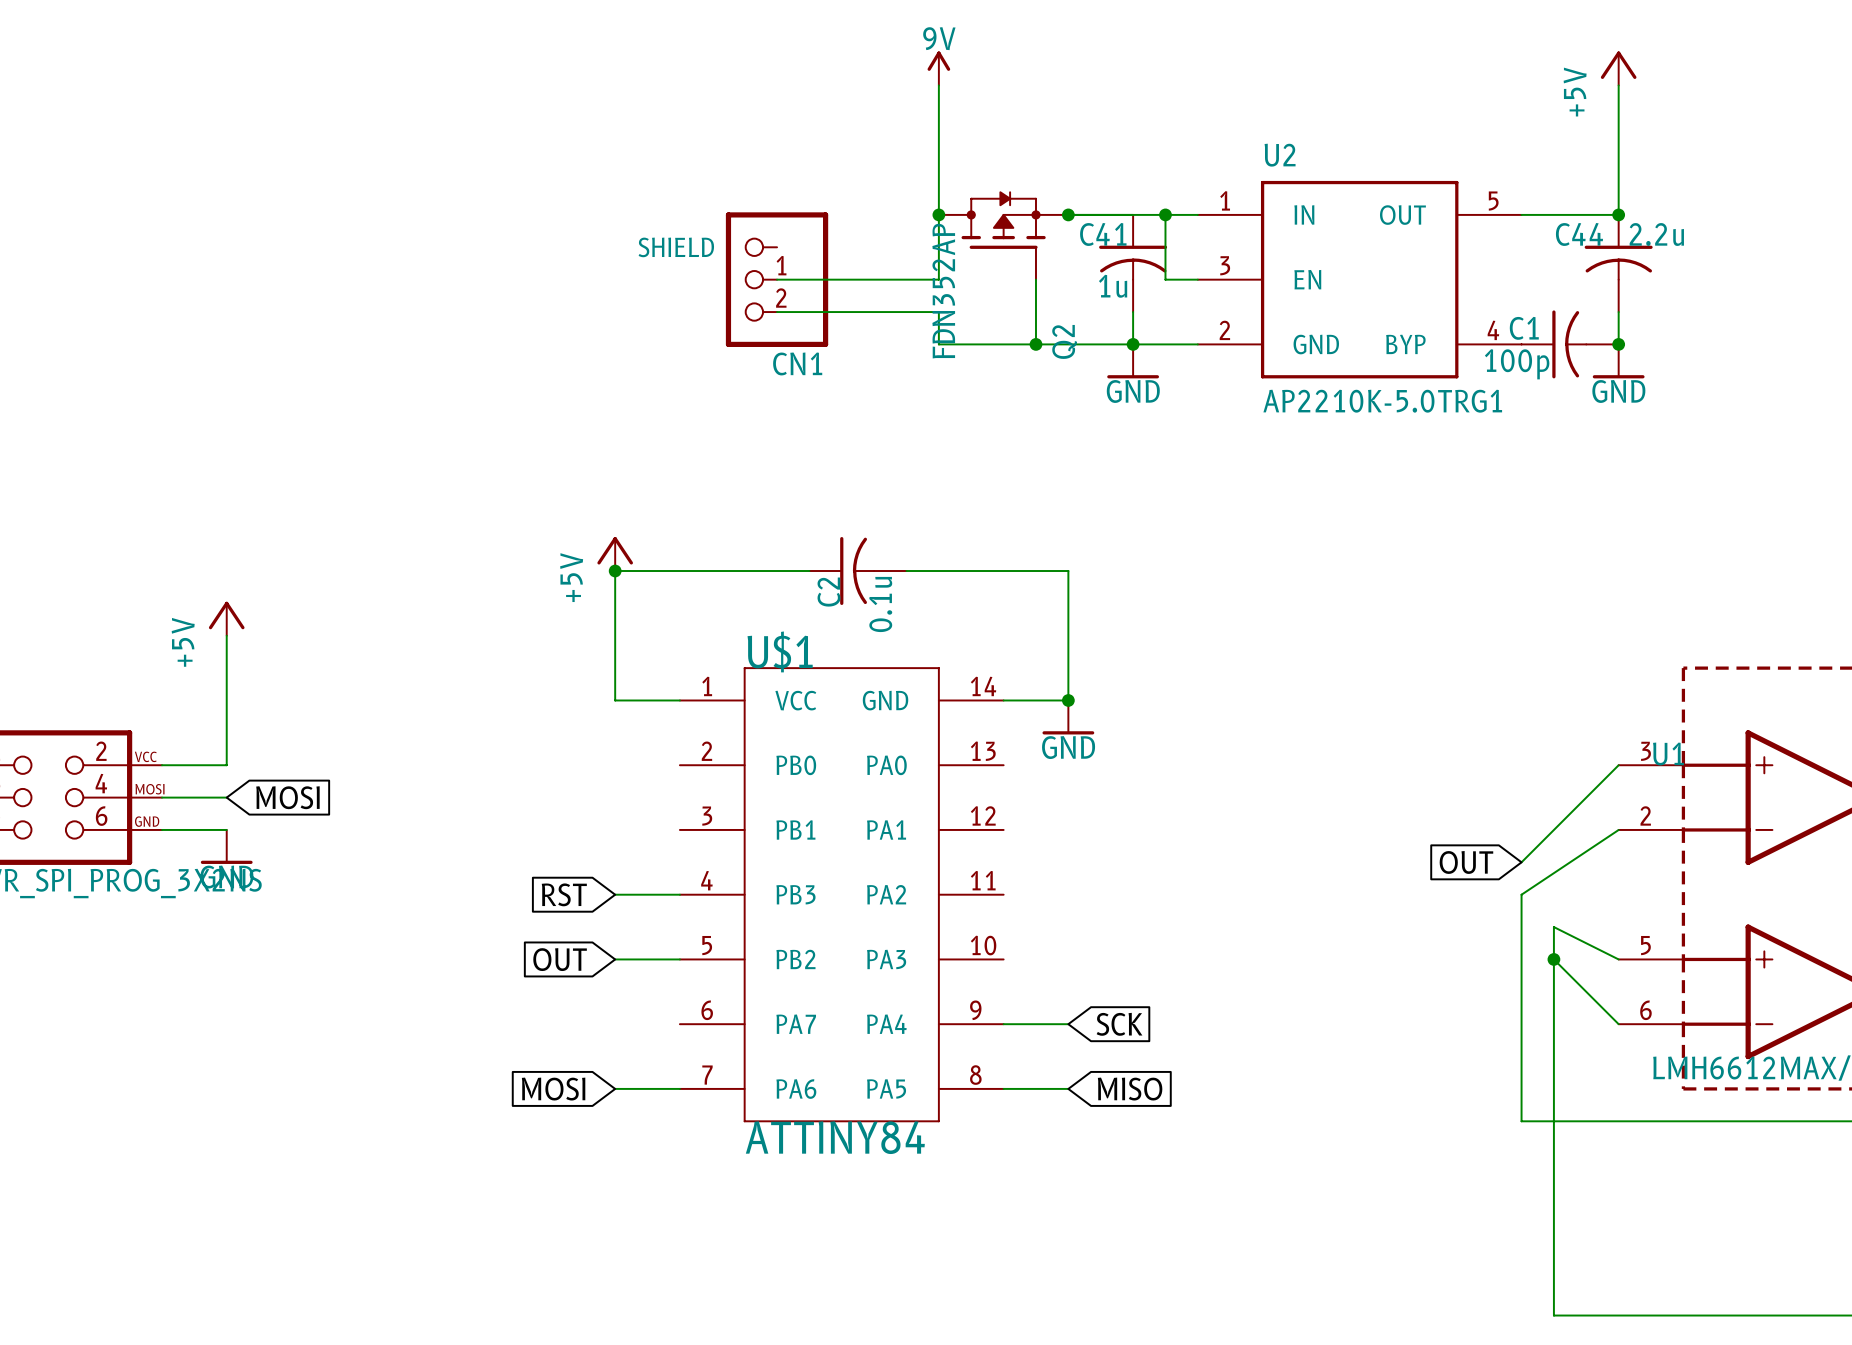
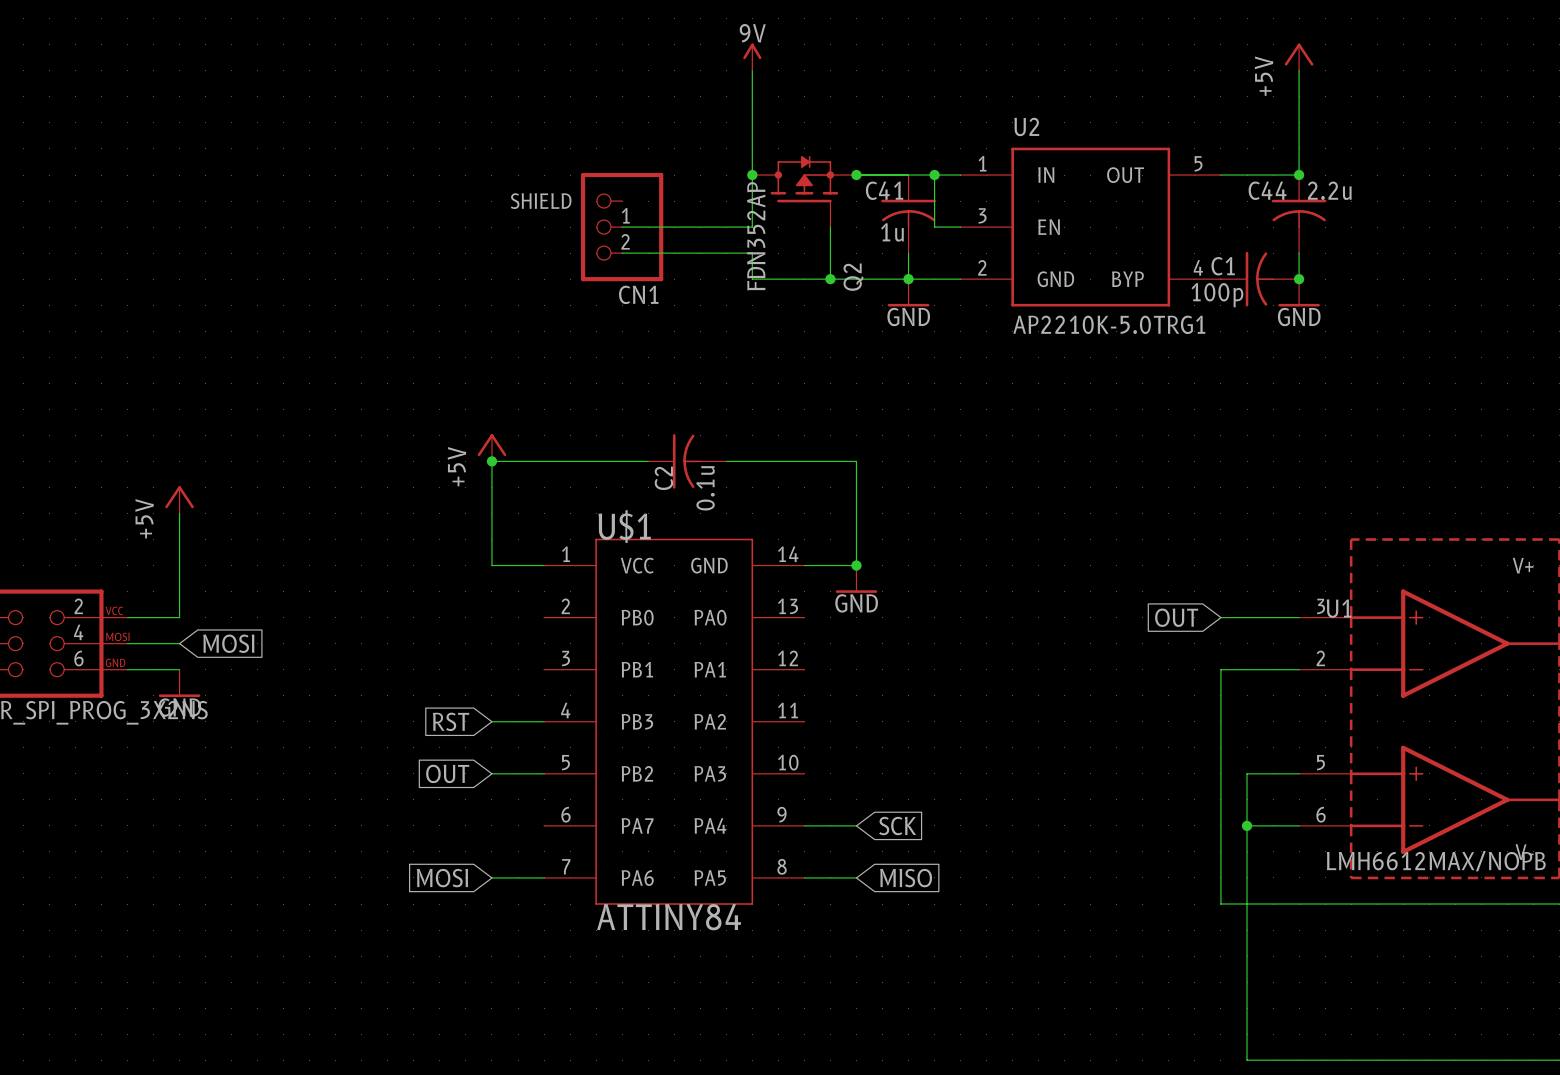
wire: (1618, 765) (1521, 862) -> (1299, 617) (1220, 617)
wire: (1618, 829) (1521, 894) -> (1299, 669) (1220, 669) (1220, 721)
global label position: OUT (1466, 862) -> OUT (1176, 617)
junction position: (1553, 959) -> (1247, 825)
wire: (1618, 959) (1553, 927) (1553, 959) (1618, 1024) -> (1299, 773) (1247, 773)
wire: none -> (1247, 825) (1299, 825)

